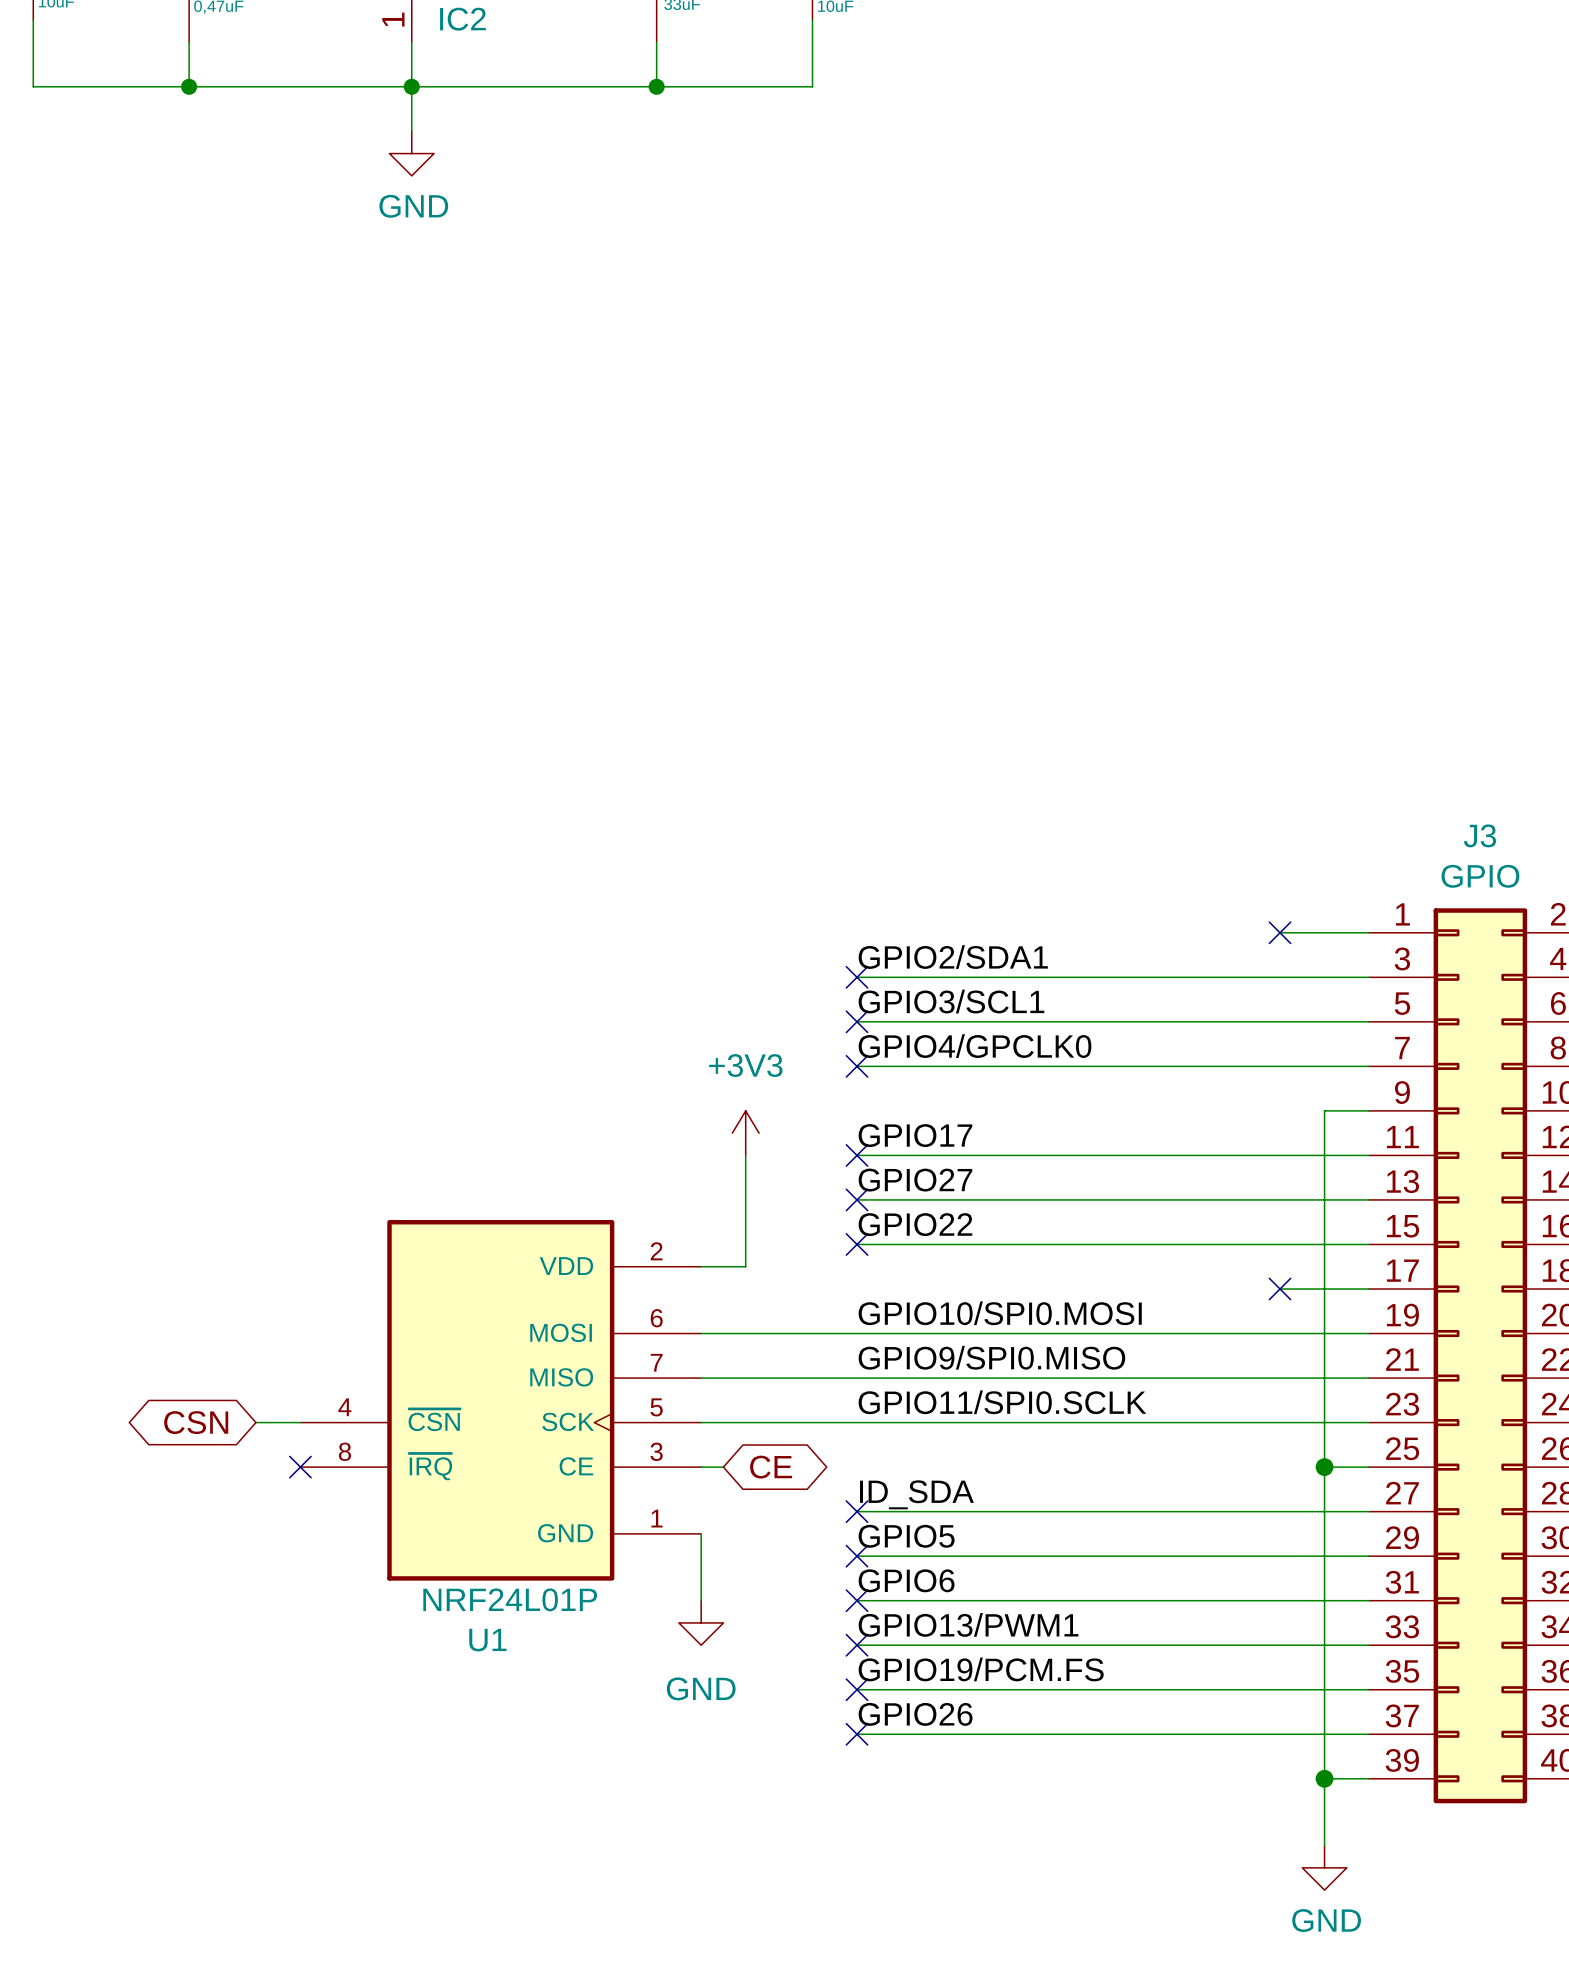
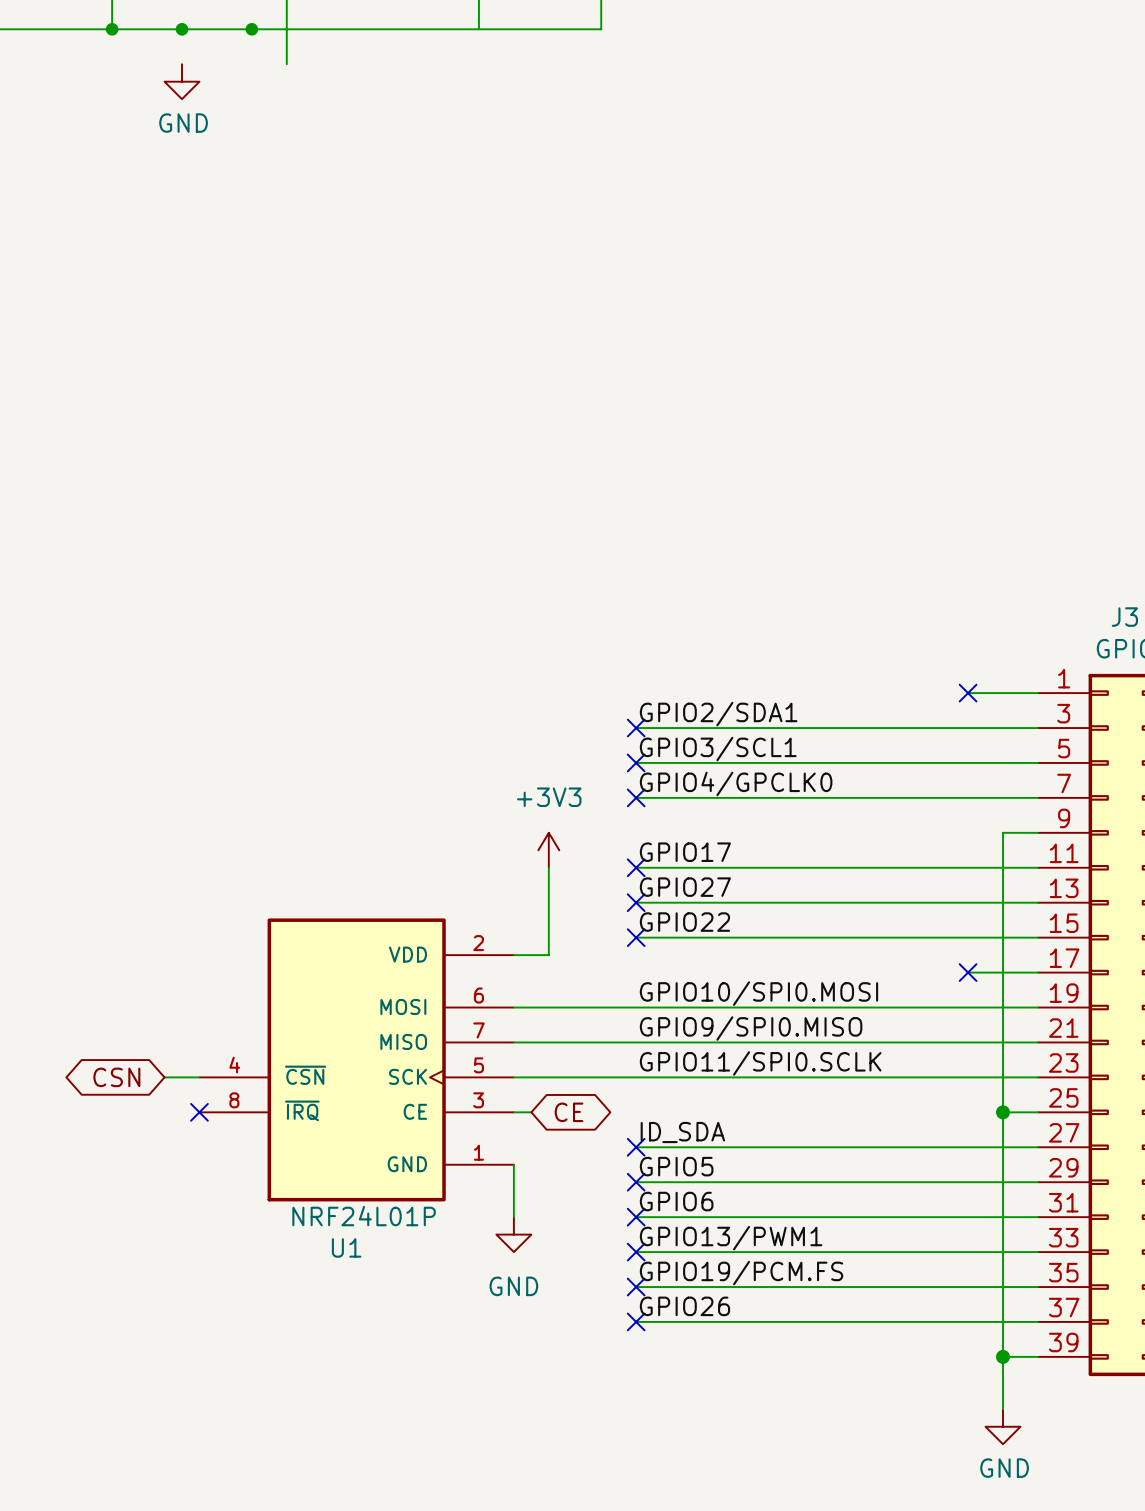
junction: none -> (181, 29)
junction position: (411, 86) -> (251, 29)
junction: (656, 86) -> none
power symbol position: GND (411, 153) -> GND (181, 81)

